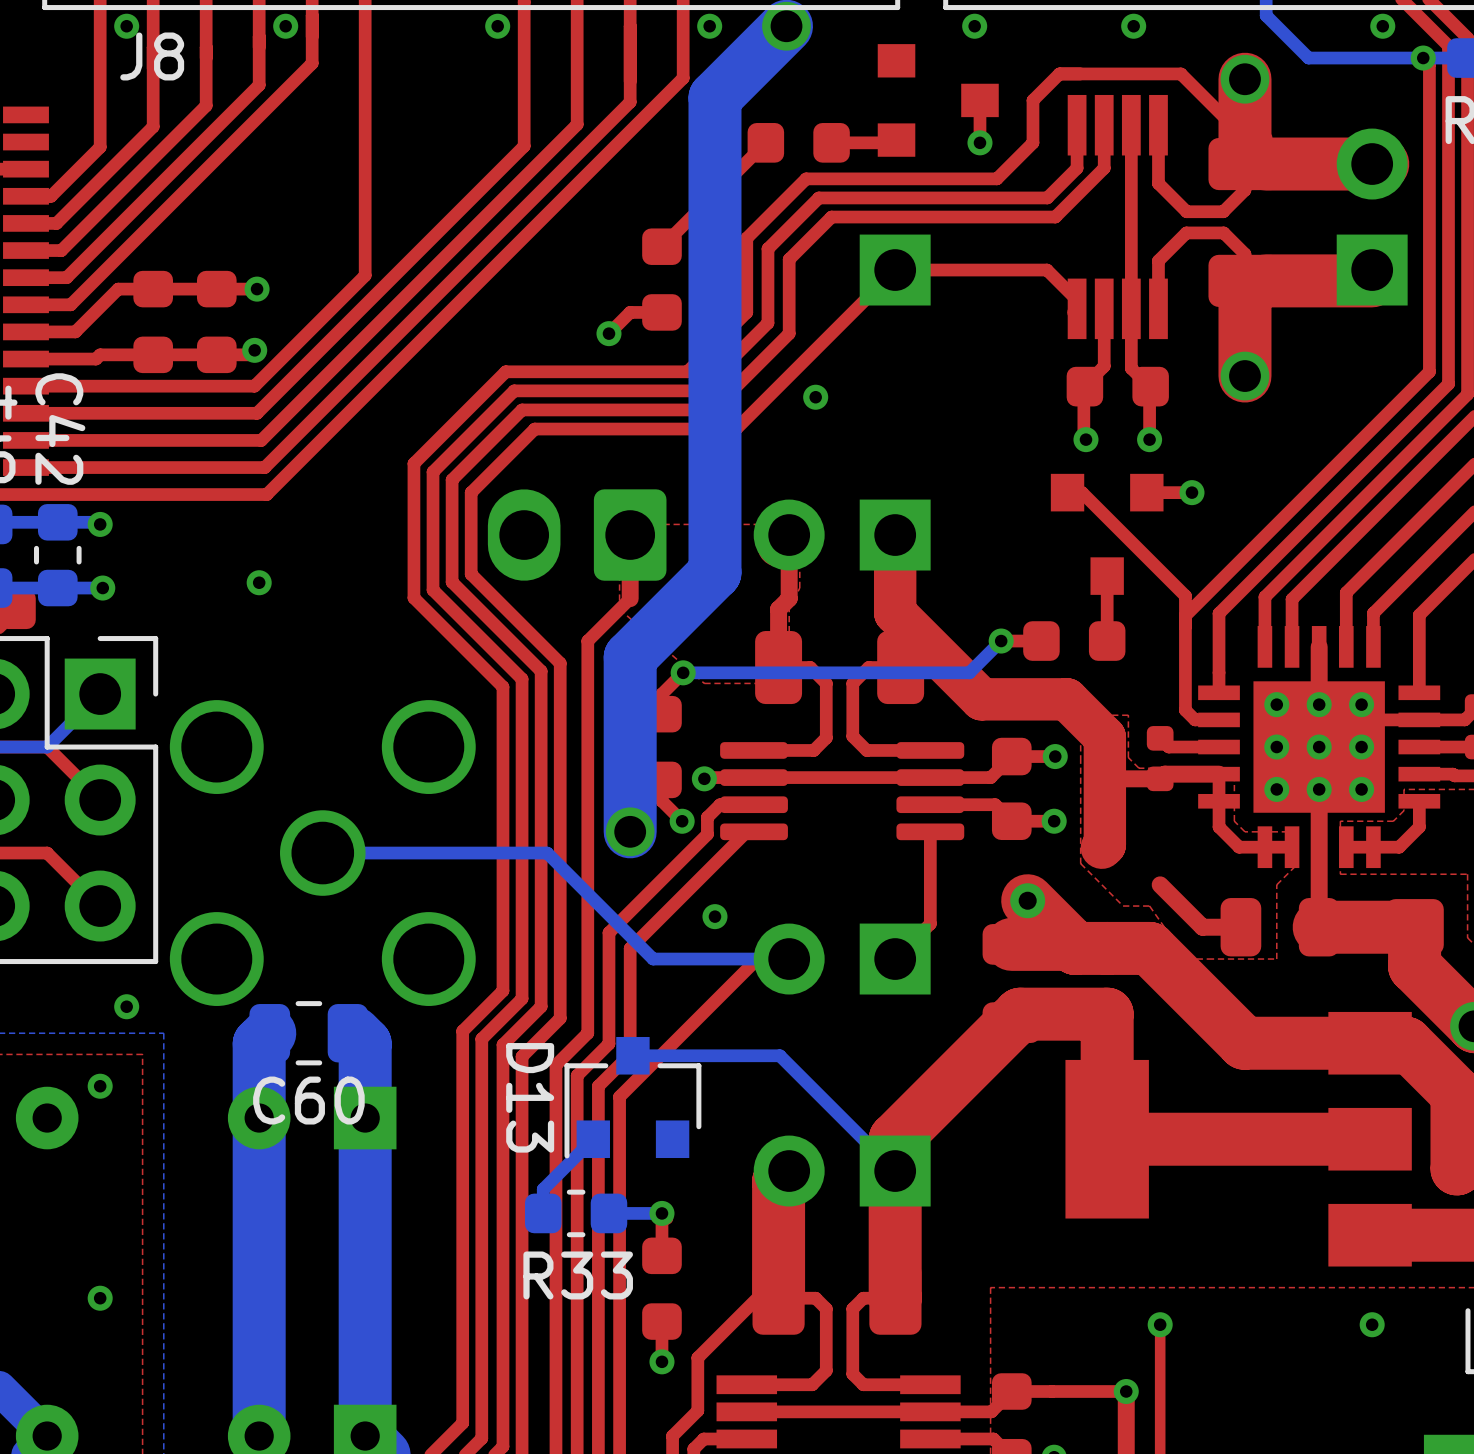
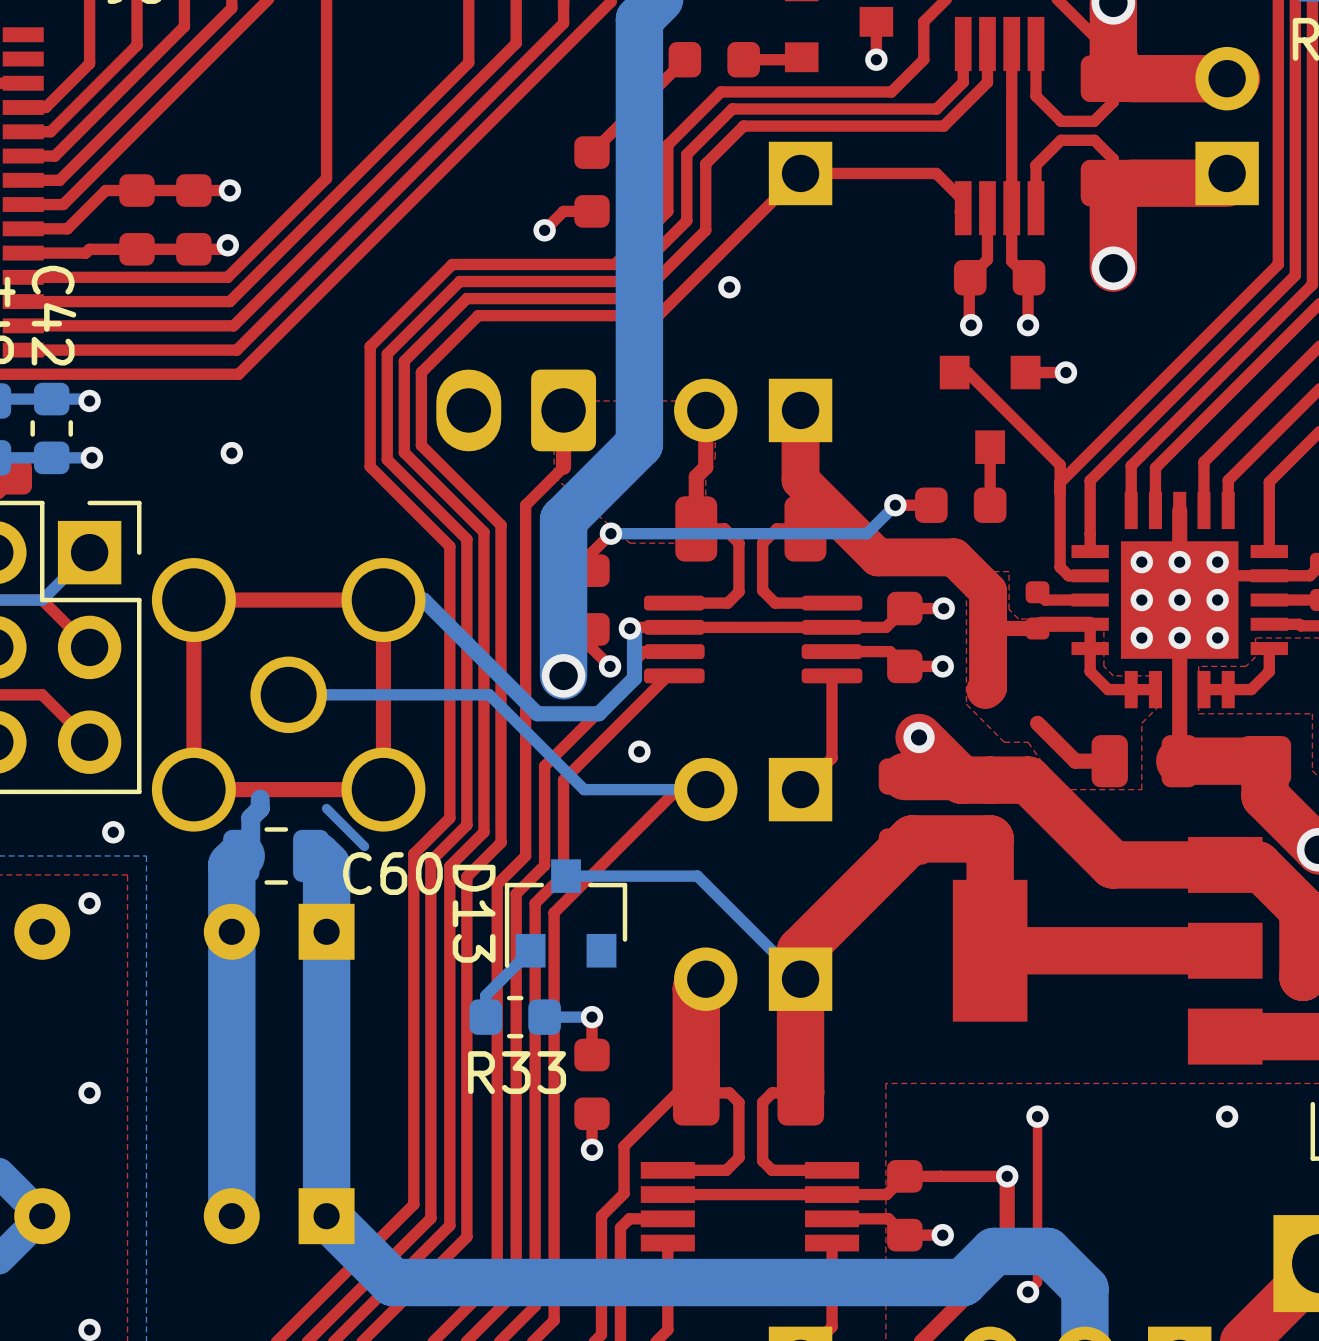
bottom track: none -> (383, 600) (423, 600) (537, 713) (598, 713) (634, 678) (634, 633) (629, 628)
top track: none -> (383, 600) (383, 789) (193, 789) (193, 600) (383, 600)
bottom track: none -> (260, 799) (260, 808) (250, 818) (250, 846) (241, 855)
bottom track: none -> (326, 808) (364, 846)
C60 name position: C60 (308, 1100) -> C60 (392, 873)

